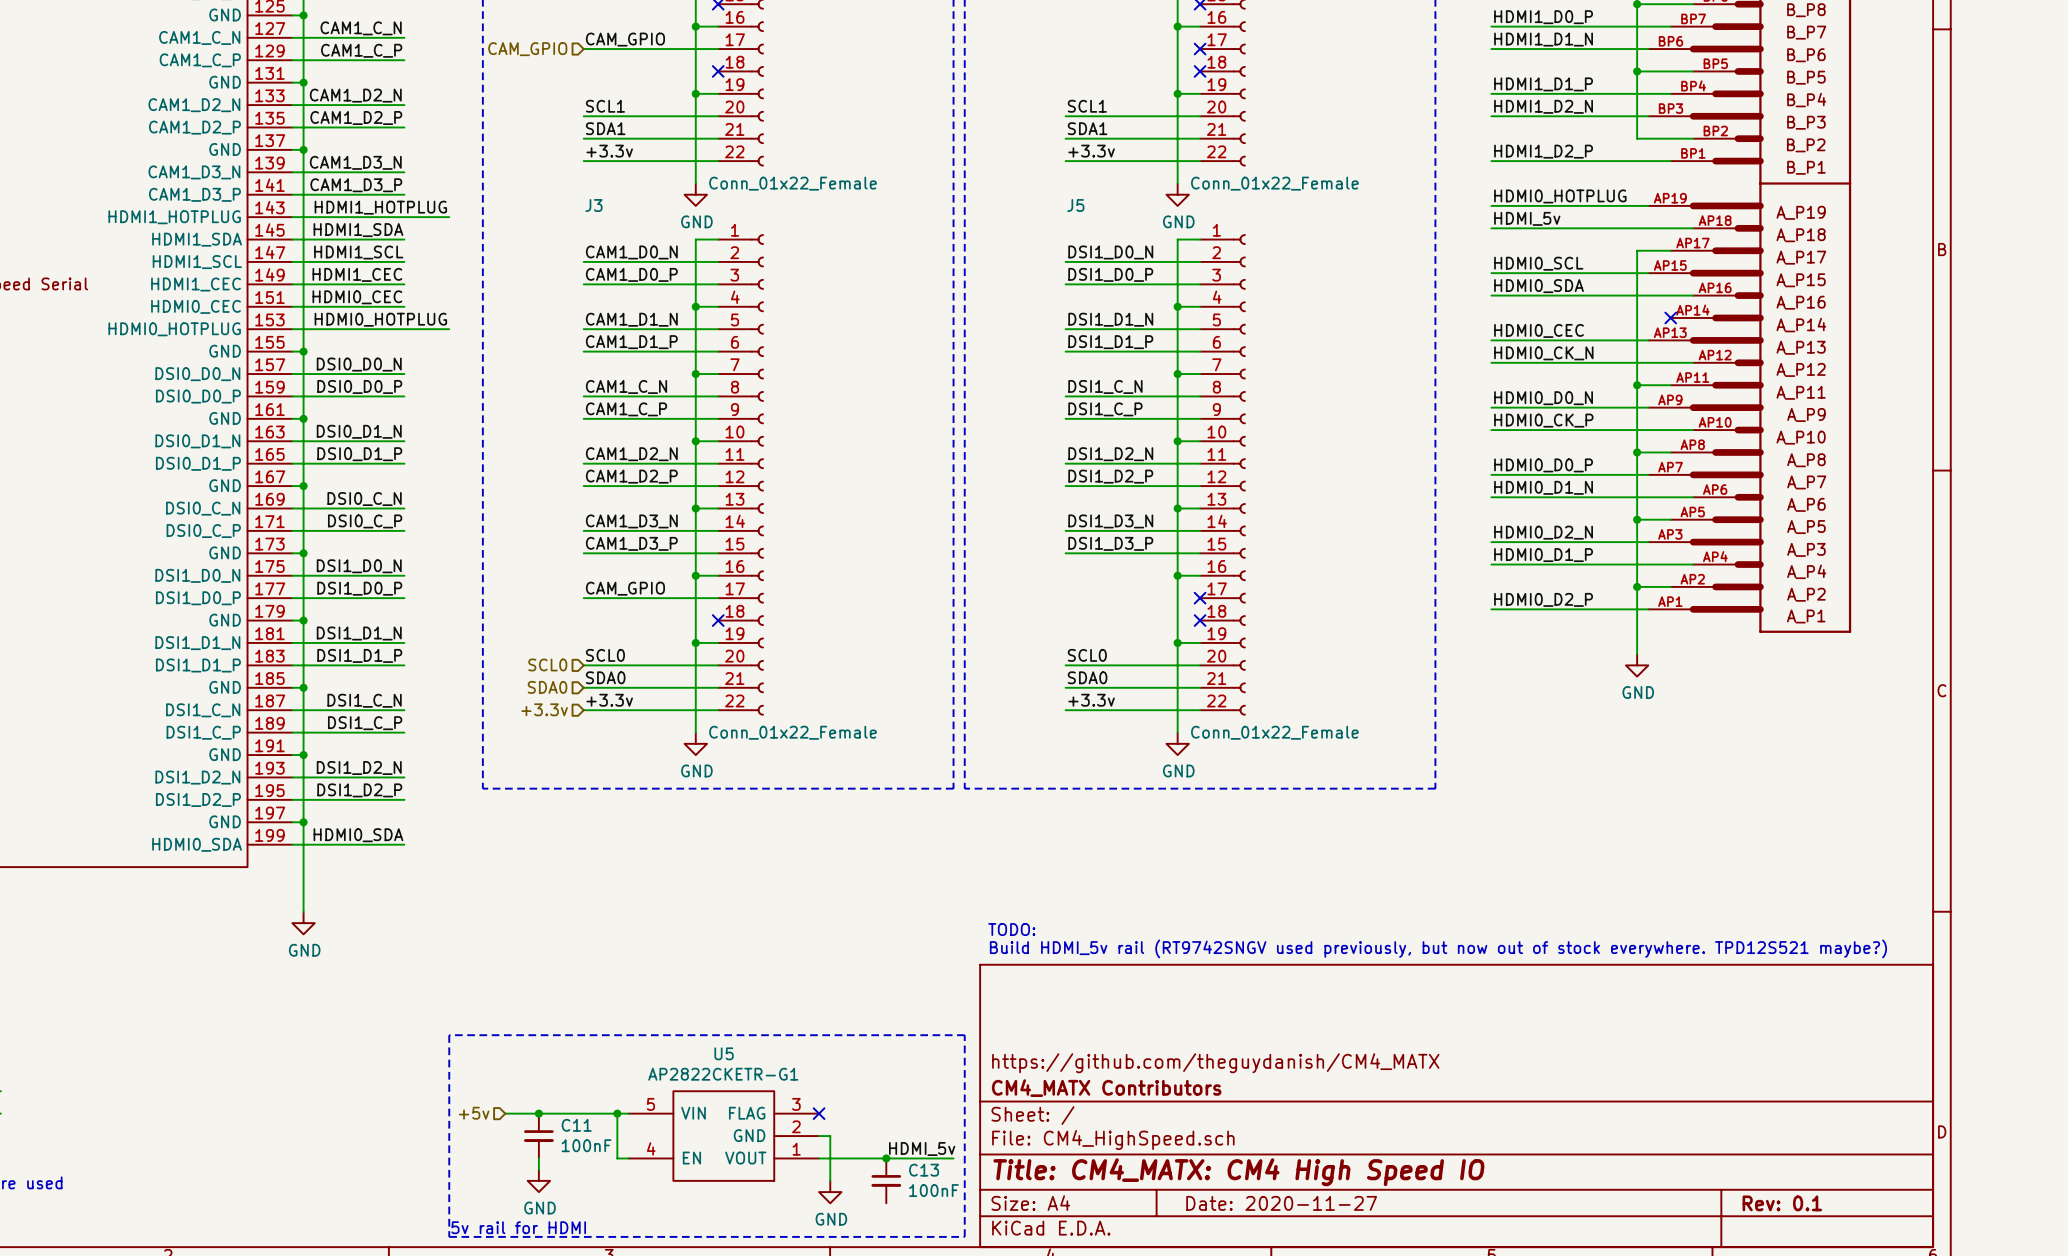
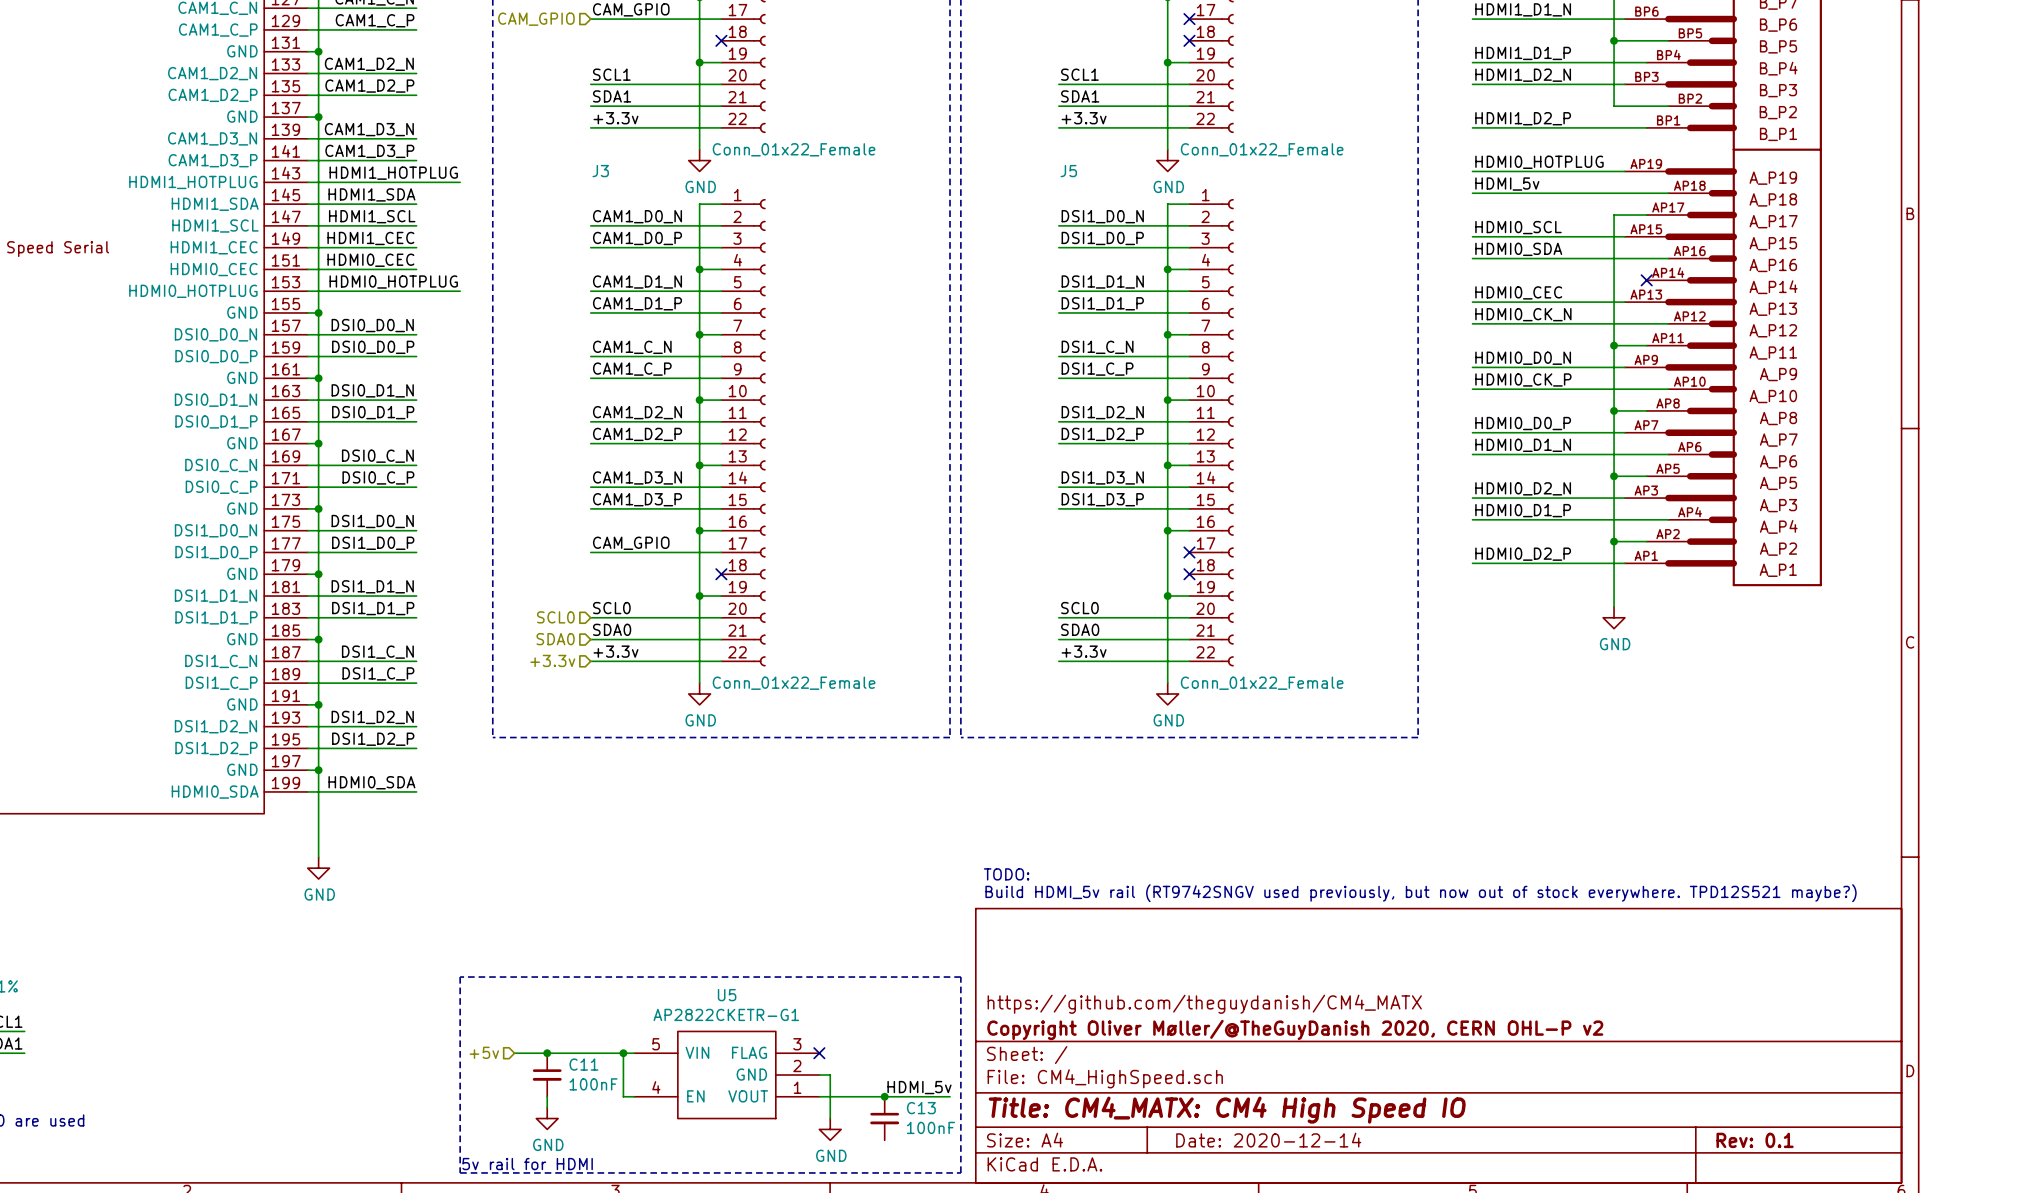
title block: CM4_MATX Contributors (1106, 1088) -> Copyright Oliver Møller/@TheGuyDanish 2020, CERN OHL-P v2 (1295, 1029)
title block: Date: 2020-11-27 (1281, 1203) -> Date: 2020-12-14 (1268, 1140)

